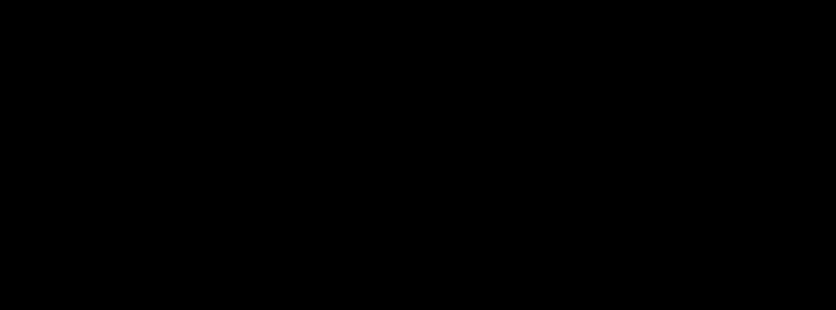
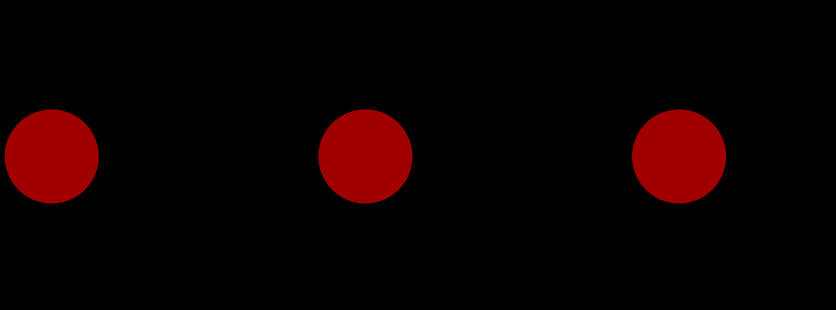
part: none -> (51, 156)
part: none -> (365, 156)
part: none -> (679, 156)

